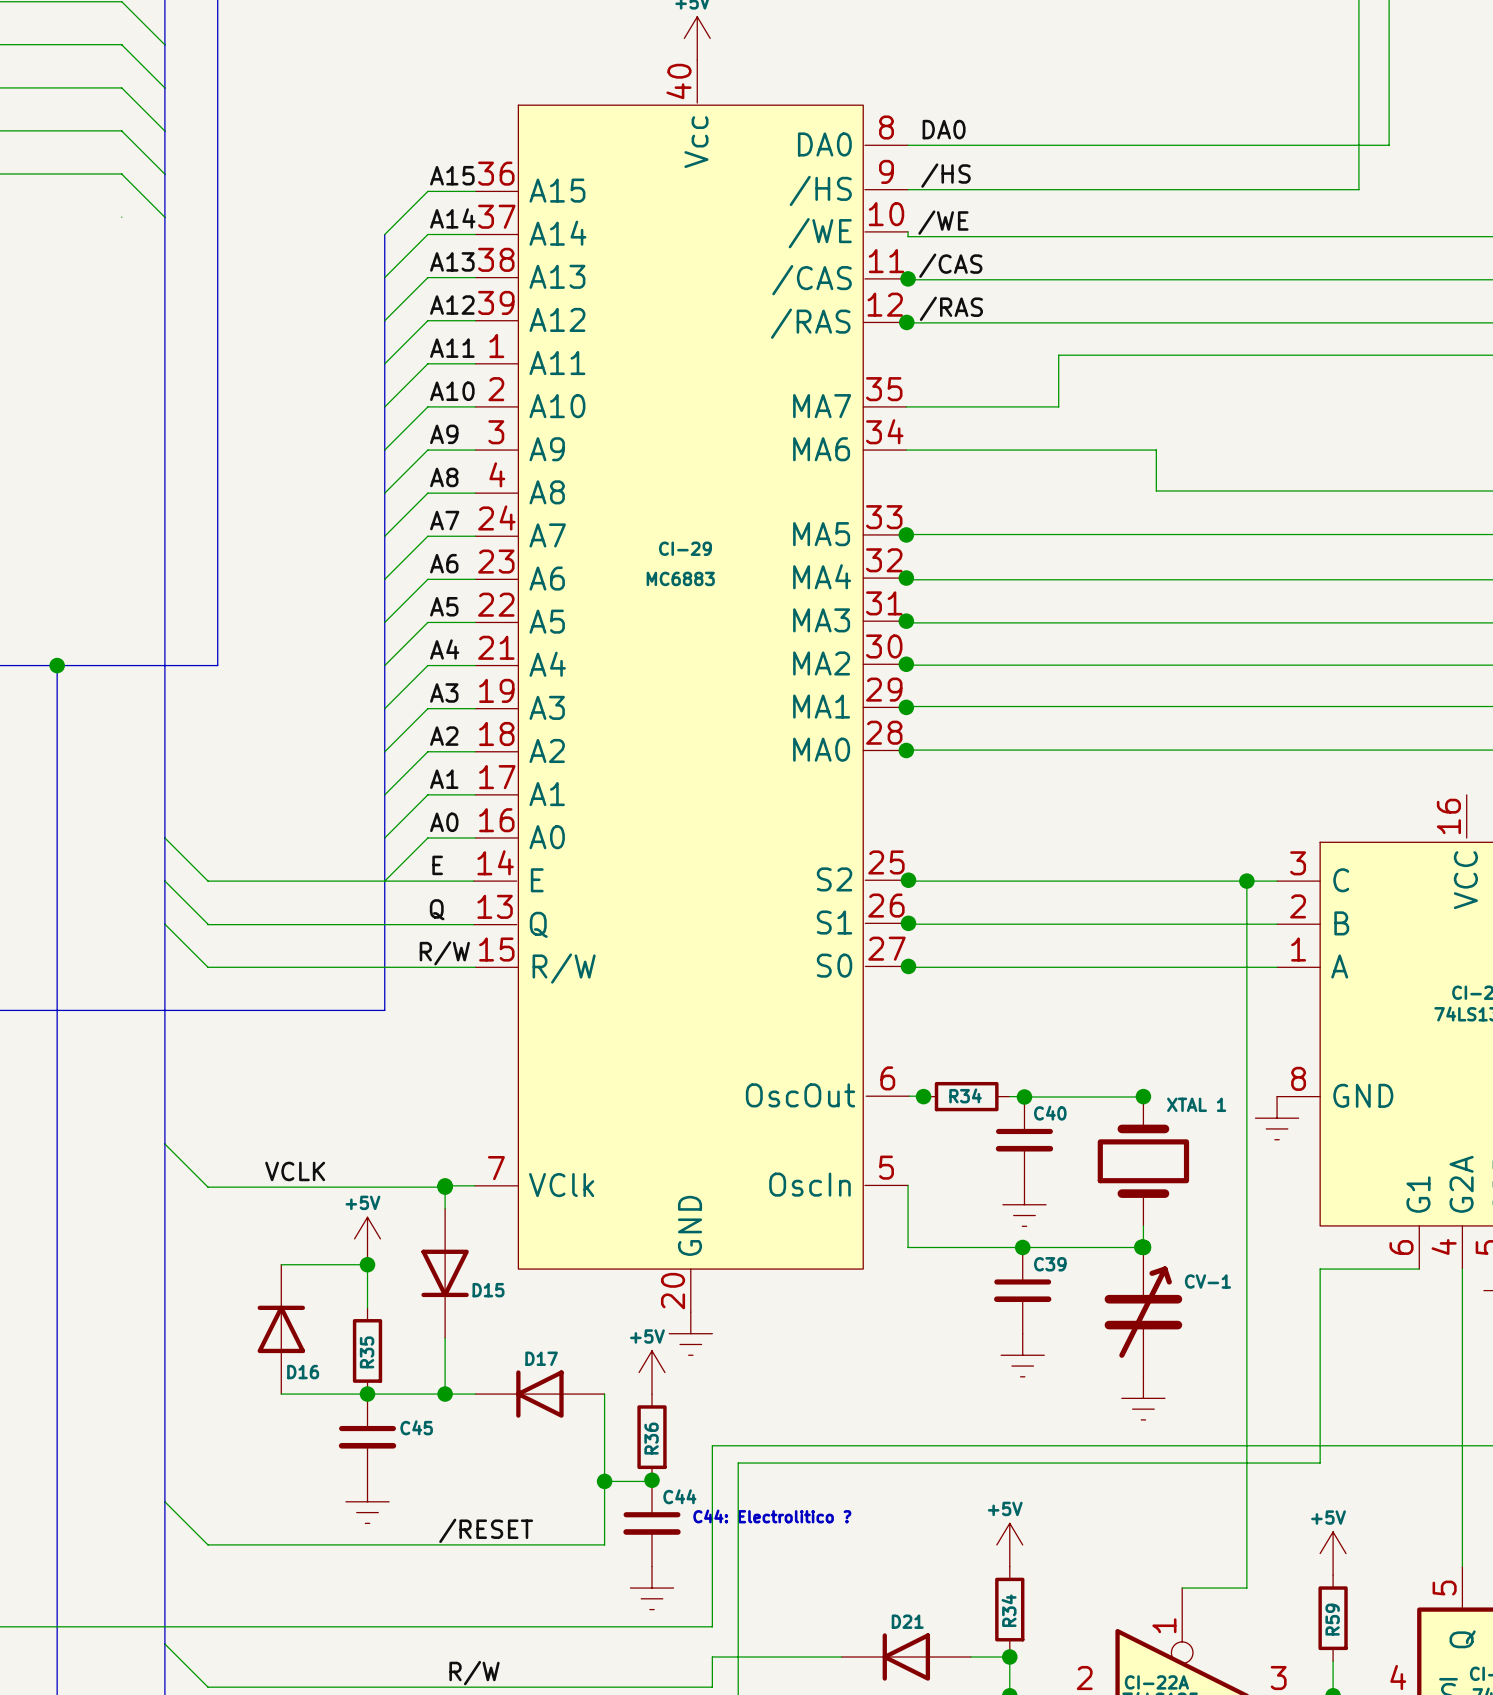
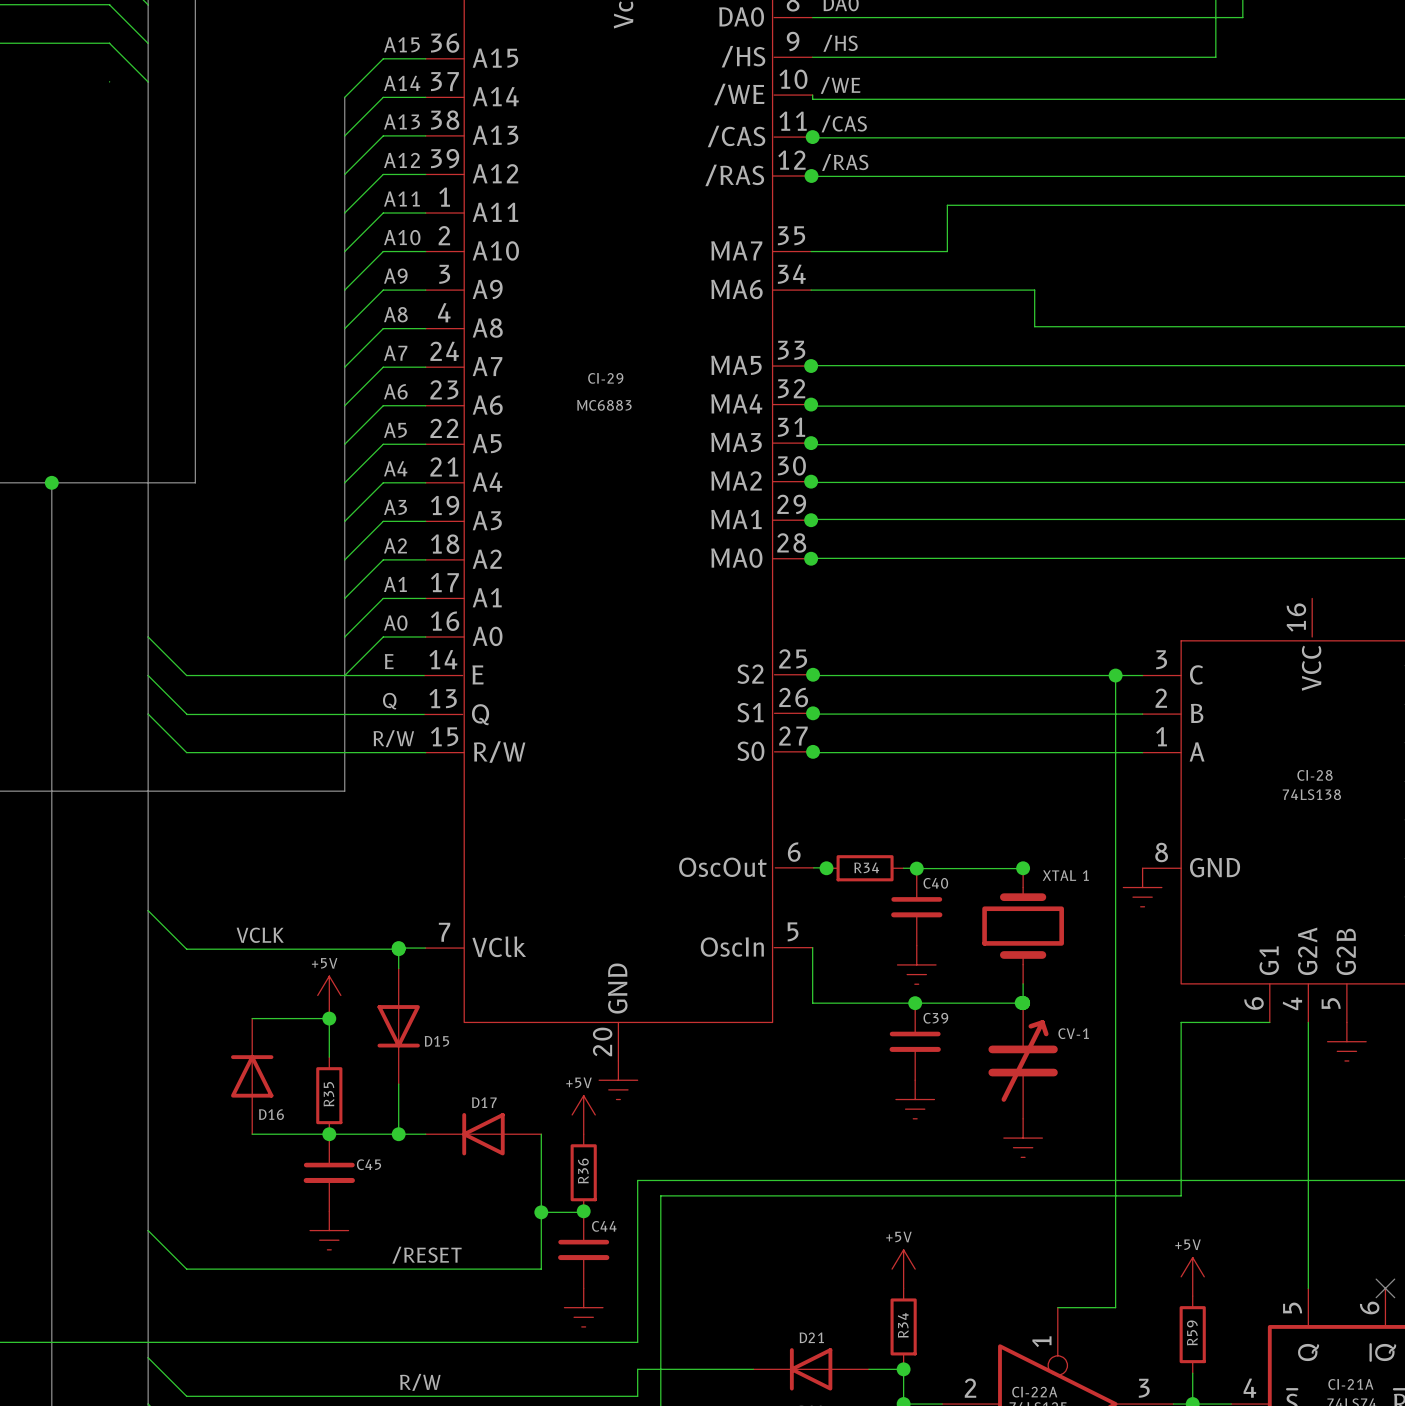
text: C44: Electrolitico ? (772, 1516) -> none

